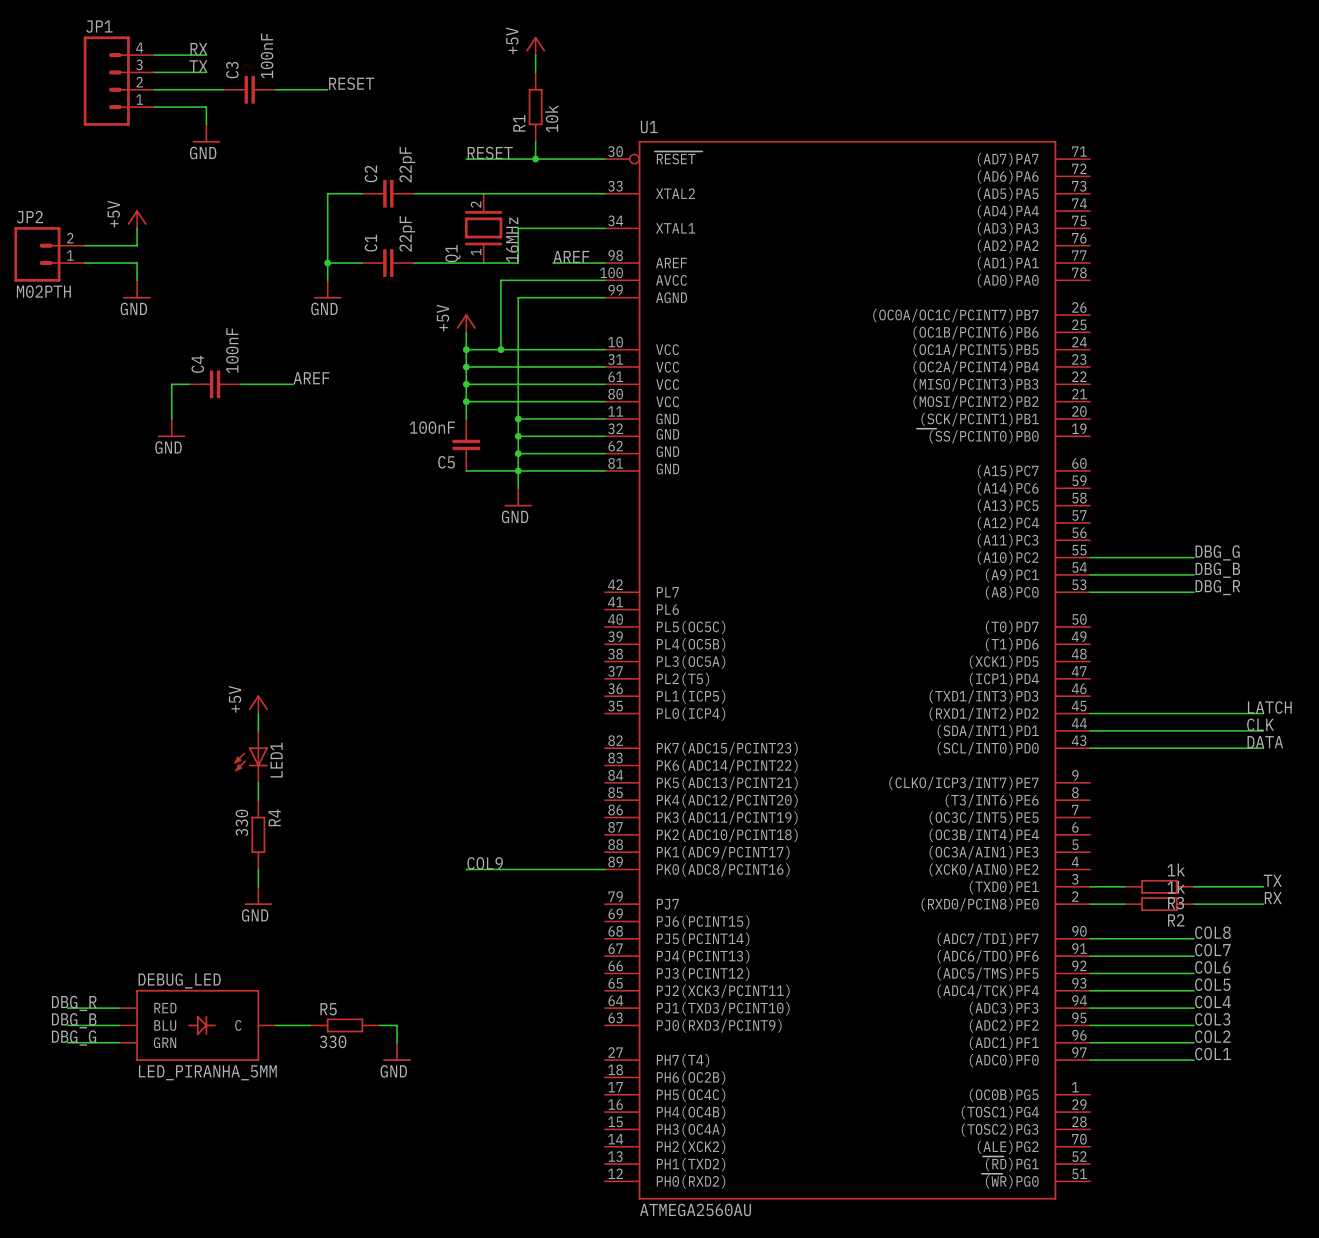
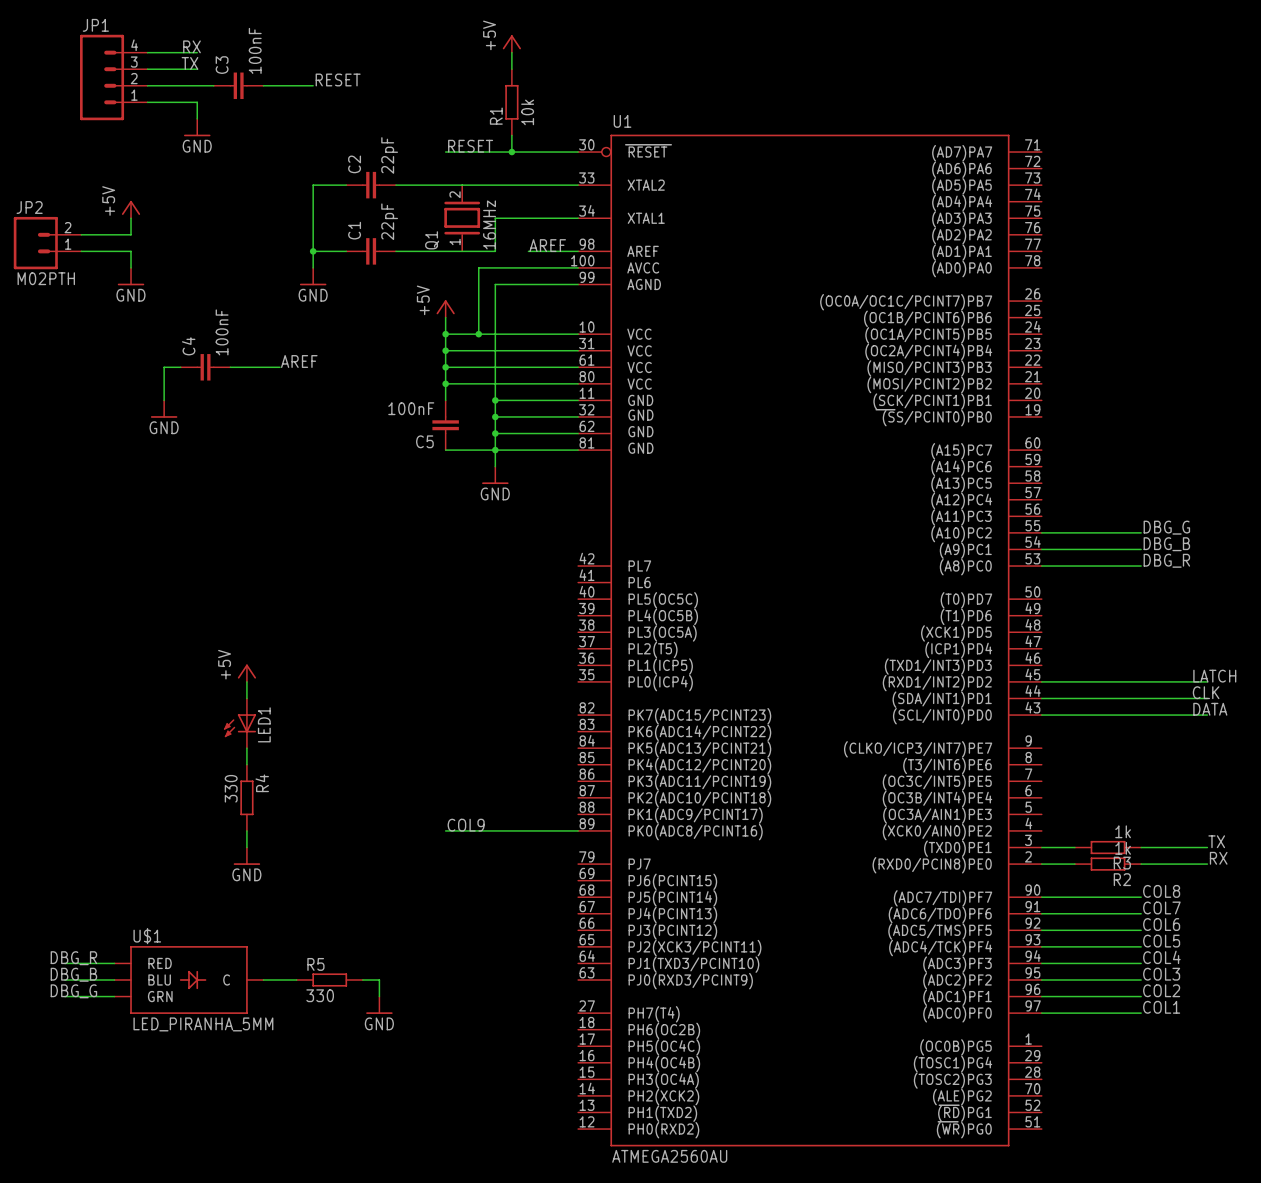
DEBUG_LED name: DEBUG_LED (179, 980) -> U$1 (147, 936)

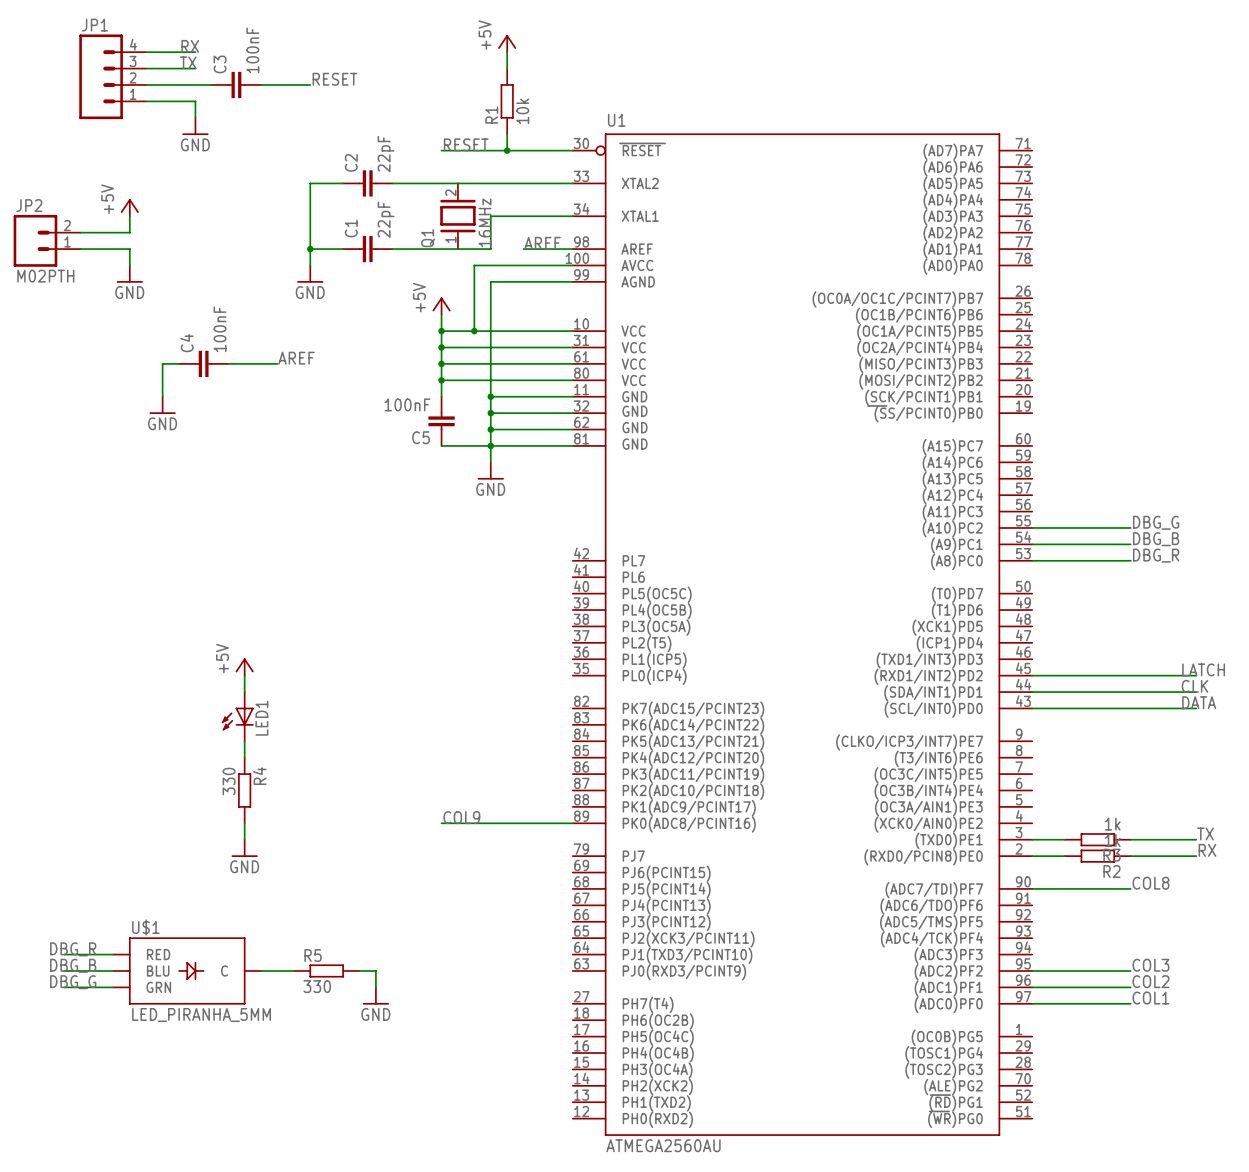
label: COL7 (1161, 907) -> none
wire: (1041, 913) (1141, 913) -> none
label: COL6 (1161, 924) -> none
wire: (1041, 930) (1141, 930) -> none
label: COL5 (1161, 941) -> none
wire: (1041, 946) (1141, 946) -> none
label: COL4 (1161, 957) -> none
wire: (1041, 963) (1141, 963) -> none

